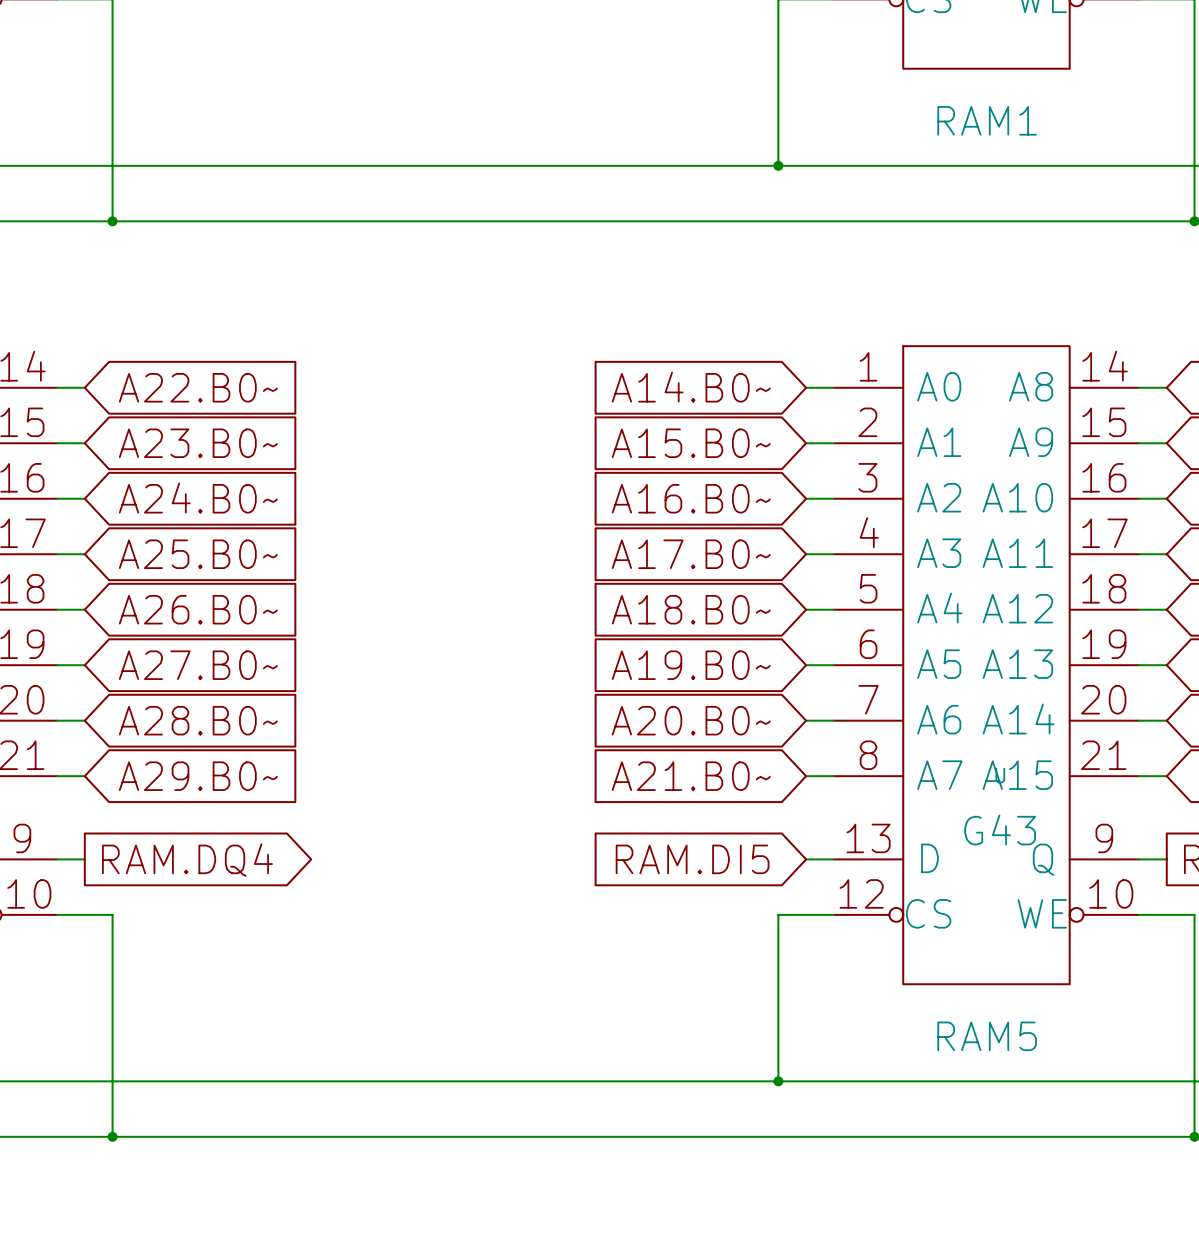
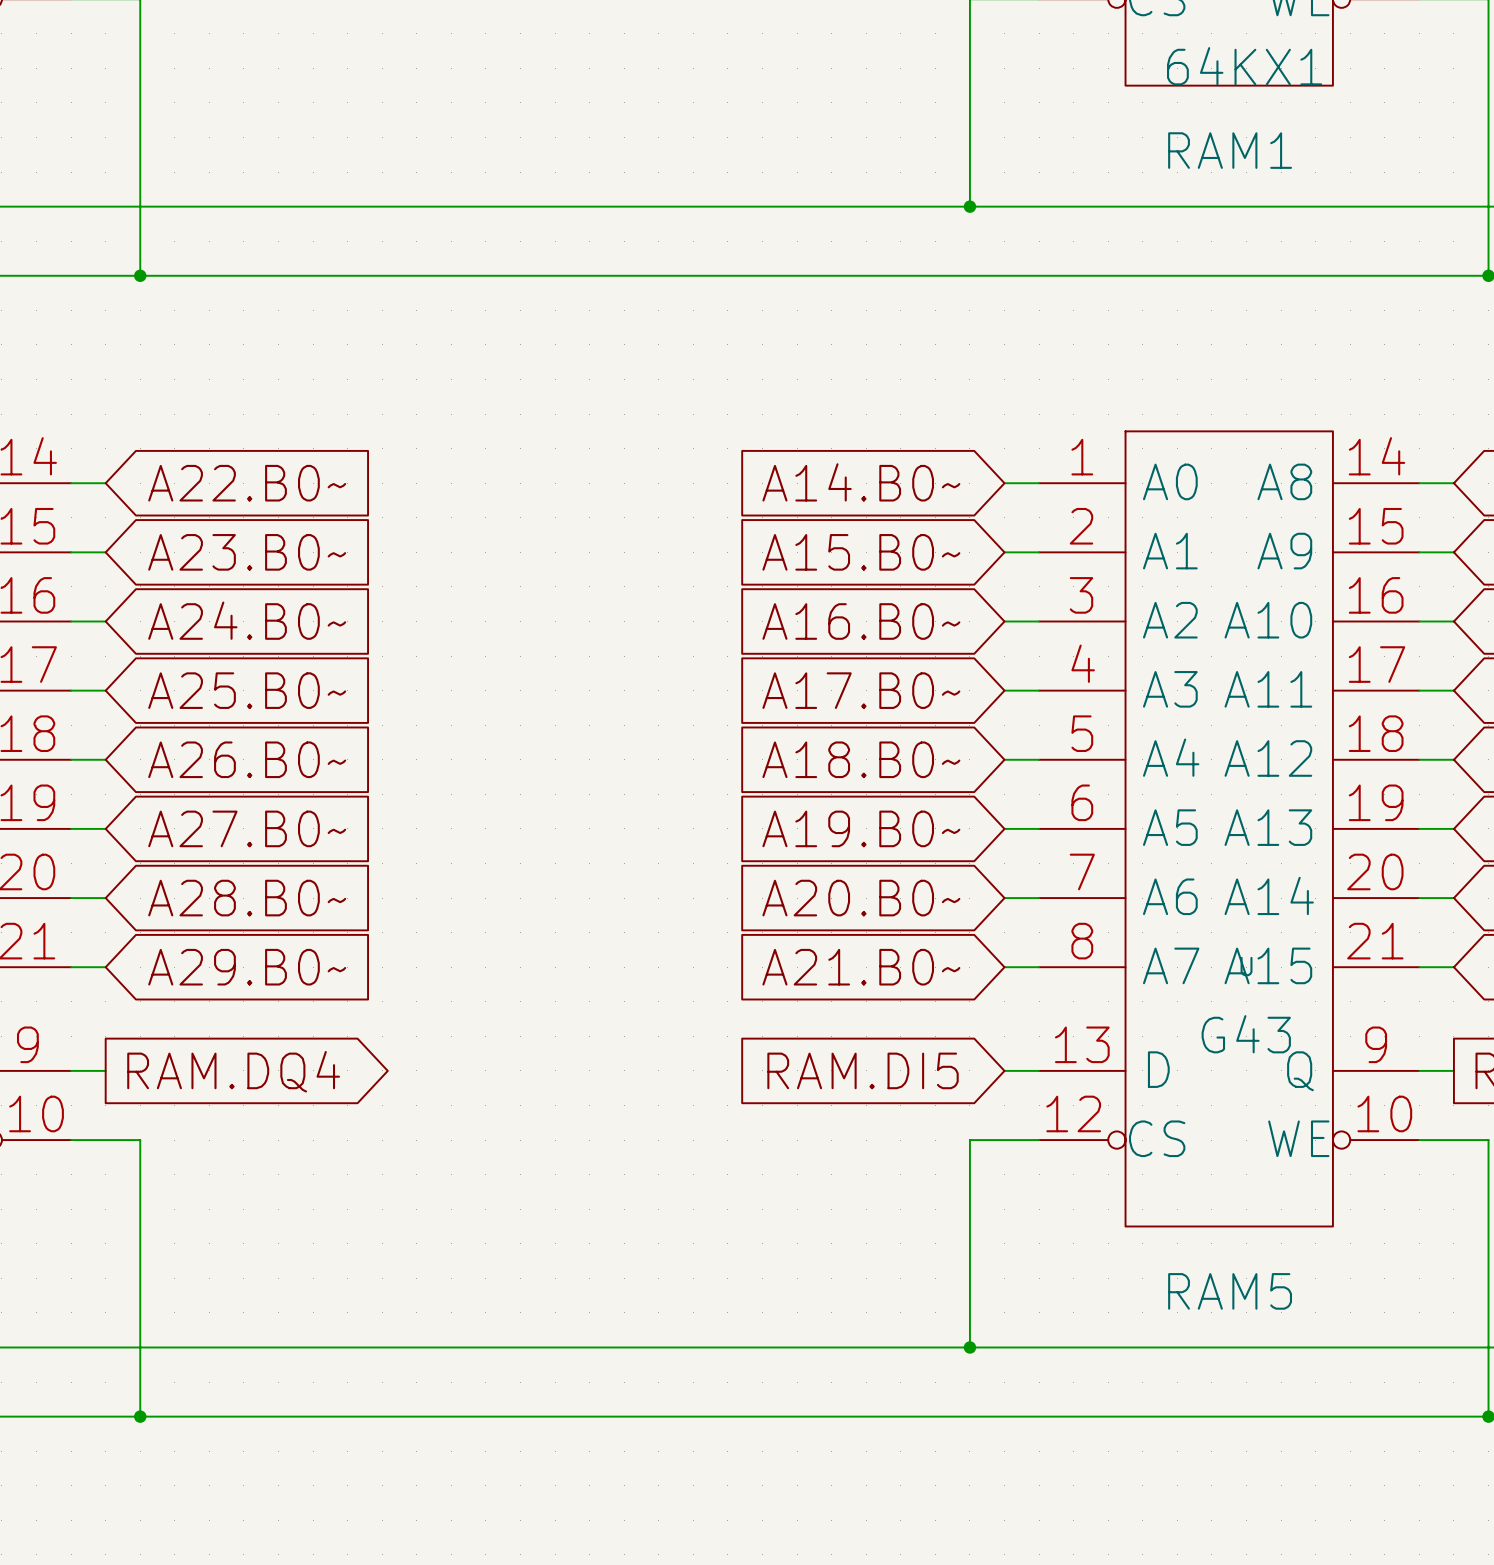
part value: none -> 64KX1 (1244, 66)

